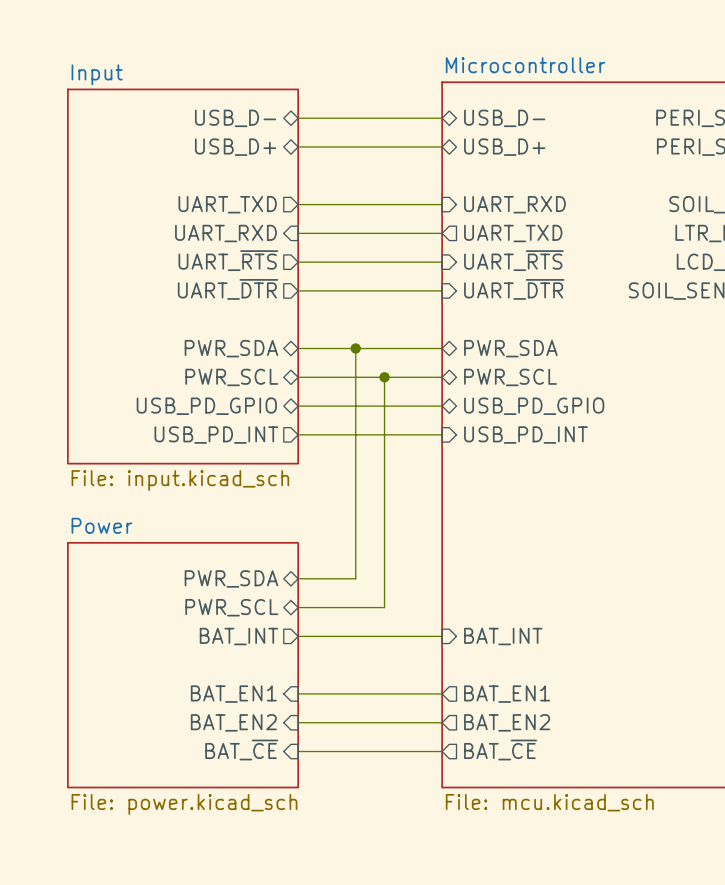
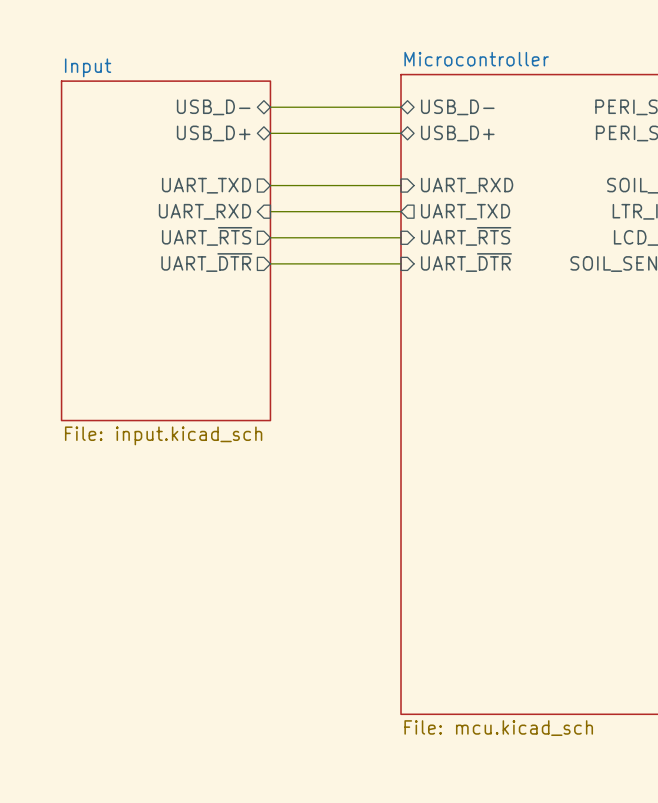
sheet pin: PWR_SDA (231, 348) -> none
wire: (298, 348) (442, 348) -> none
wire: (355, 348) (355, 578) (298, 578) -> none
junction: (355, 348) -> none
sheet pin: PWR_SDA (510, 348) -> none
sheet pin: PWR_SCL (231, 377) -> none
wire: (298, 377) (442, 377) -> none
wire: (384, 377) (384, 607) (298, 607) -> none
junction: (384, 377) -> none
sheet pin: PWR_SCL (510, 377) -> none
sheet pin: USB_PD_GPIO (206, 406) -> none
wire: (298, 406) (442, 406) -> none
sheet pin: USB_PD_GPIO (534, 406) -> none
wire: (298, 434) (442, 434) -> none
sheet pin: USB_PD_INT (216, 435) -> none
sheet pin: USB_PD_INT (525, 435) -> none
sheet pin: PWR_SDA (231, 578) -> none
sheet pin: PWR_SCL (231, 607) -> none
sheet pin: BAT_INT (239, 636) -> none
wire: (298, 636) (442, 636) -> none
sheet pin: BAT_INT (503, 636) -> none
sheet Power: File: power.kicad_sch (183, 665) -> none
wire: (298, 693) (442, 693) -> none
sheet pin: BAT_EN1 (233, 694) -> none
sheet pin: BAT_EN1 (507, 694) -> none
sheet pin: BAT_EN2 (233, 722) -> none
wire: (298, 722) (442, 722) -> none
sheet pin: BAT_EN2 (507, 722) -> none
sheet pin: BAT_~{CE} (241, 750) -> none
sheet pin: BAT_~{CE} (500, 750) -> none
wire: (298, 751) (442, 751) -> none

